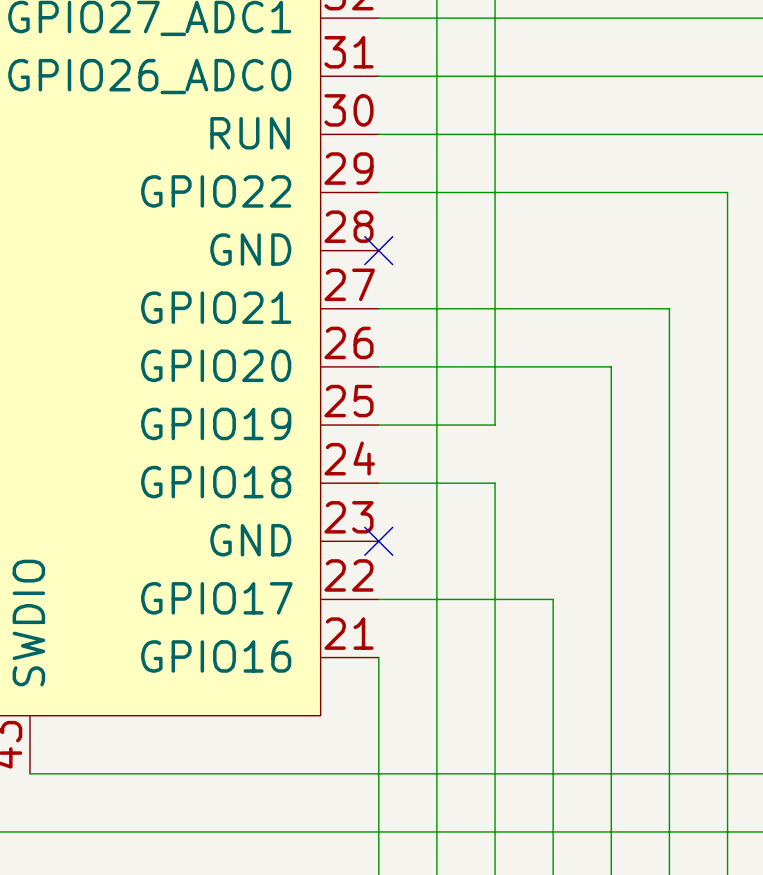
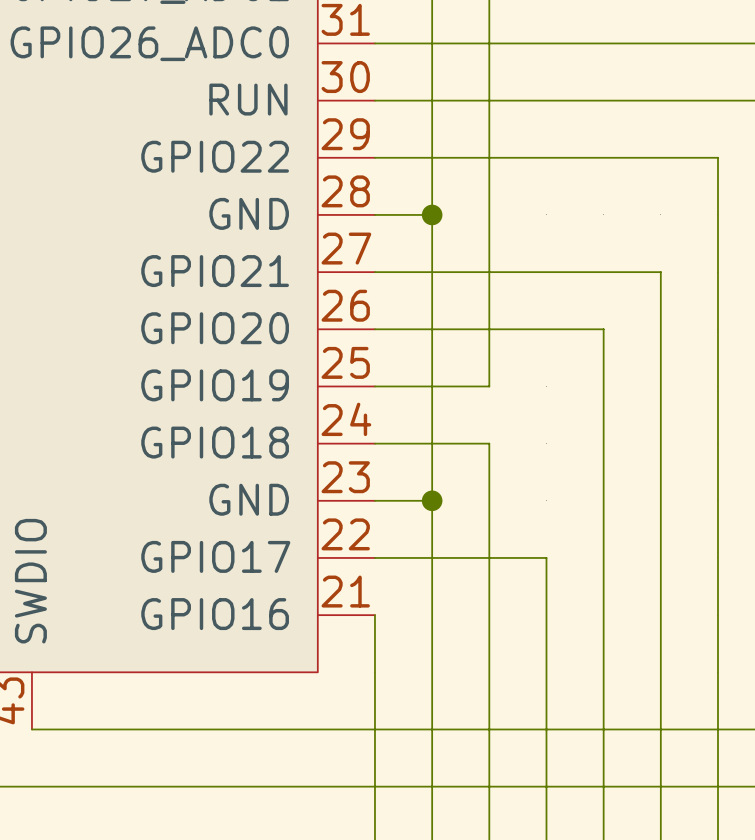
wire: none -> (374, 214) (432, 214)
no-connect mark: (378, 250) -> none
junction: none -> (432, 214)
wire: none -> (374, 500) (432, 500)
no-connect mark: (378, 541) -> none
junction: none -> (432, 500)

